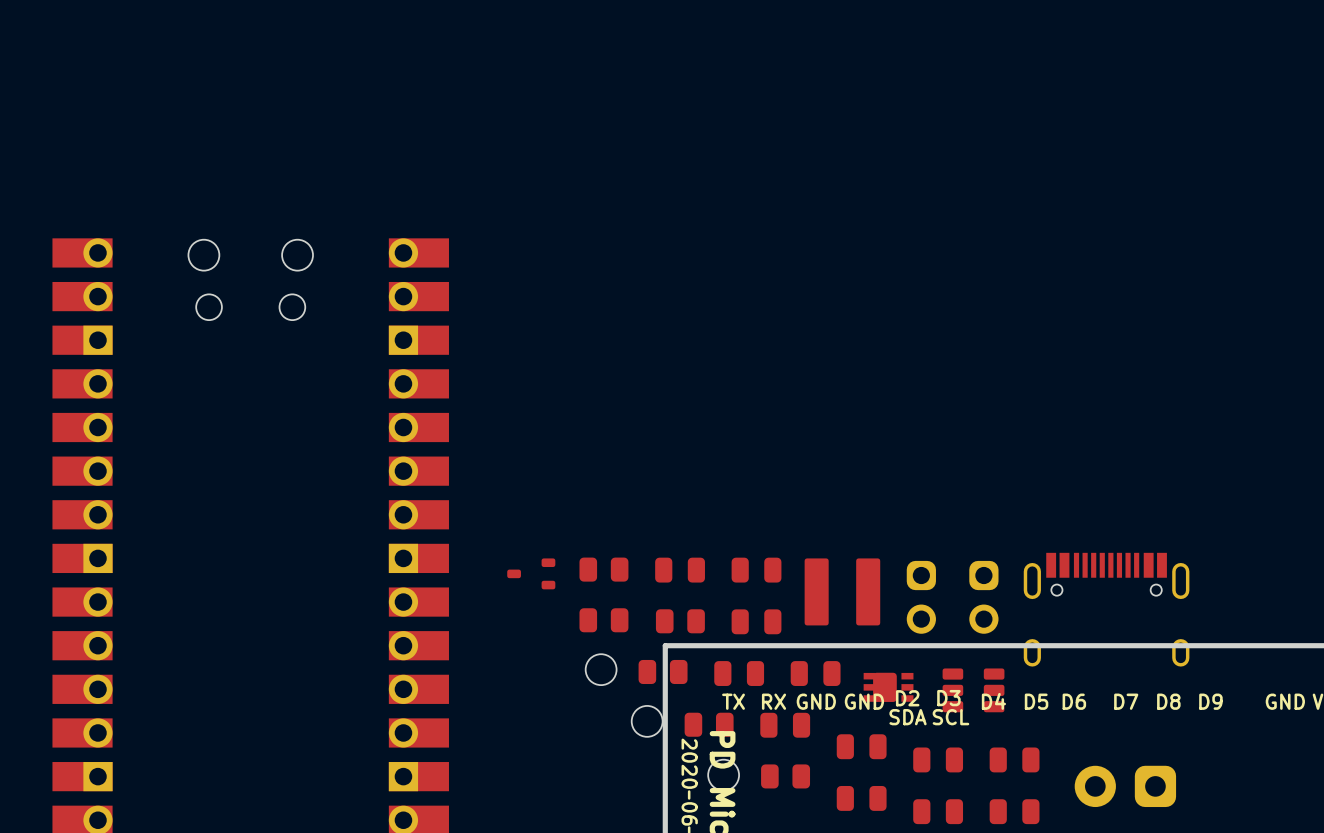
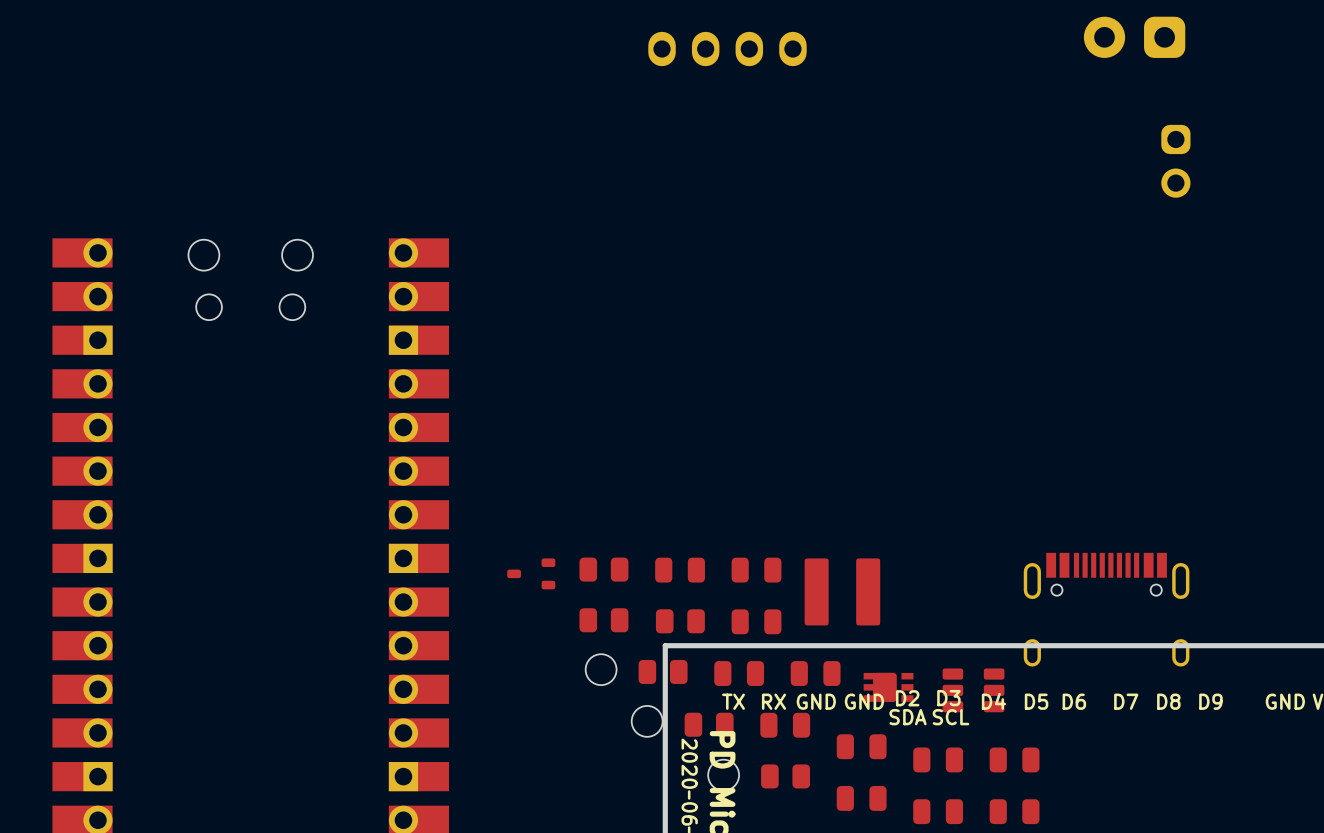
part: none -> (1134, 37)
part: none -> (727, 49)
part: none -> (1175, 161)
part: (921, 597) -> none
part: (983, 597) -> none
part: (1125, 786) -> none

